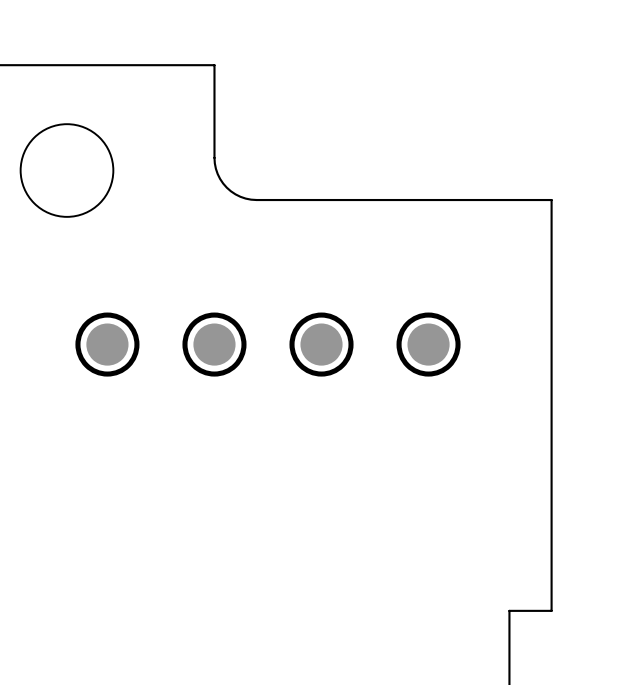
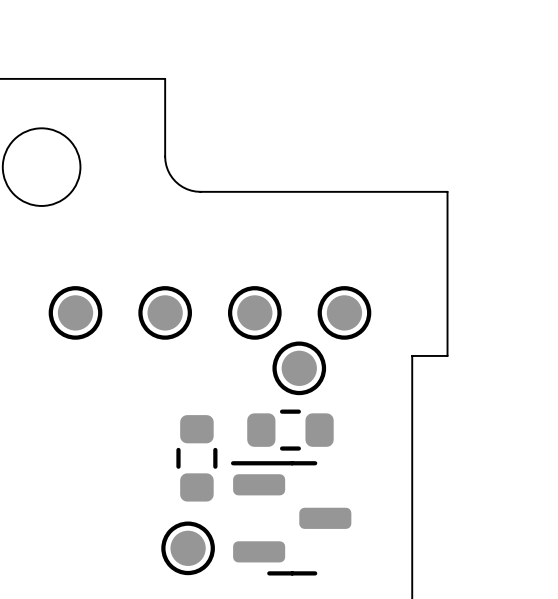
board edge: (551, 395) (551, 610) (509, 610) -> (447, 355) (412, 355) (412, 535)
part: none -> (299, 368)
part: none -> (290, 430)
part: none -> (196, 458)
part: none -> (291, 518)
part: none -> (188, 548)

